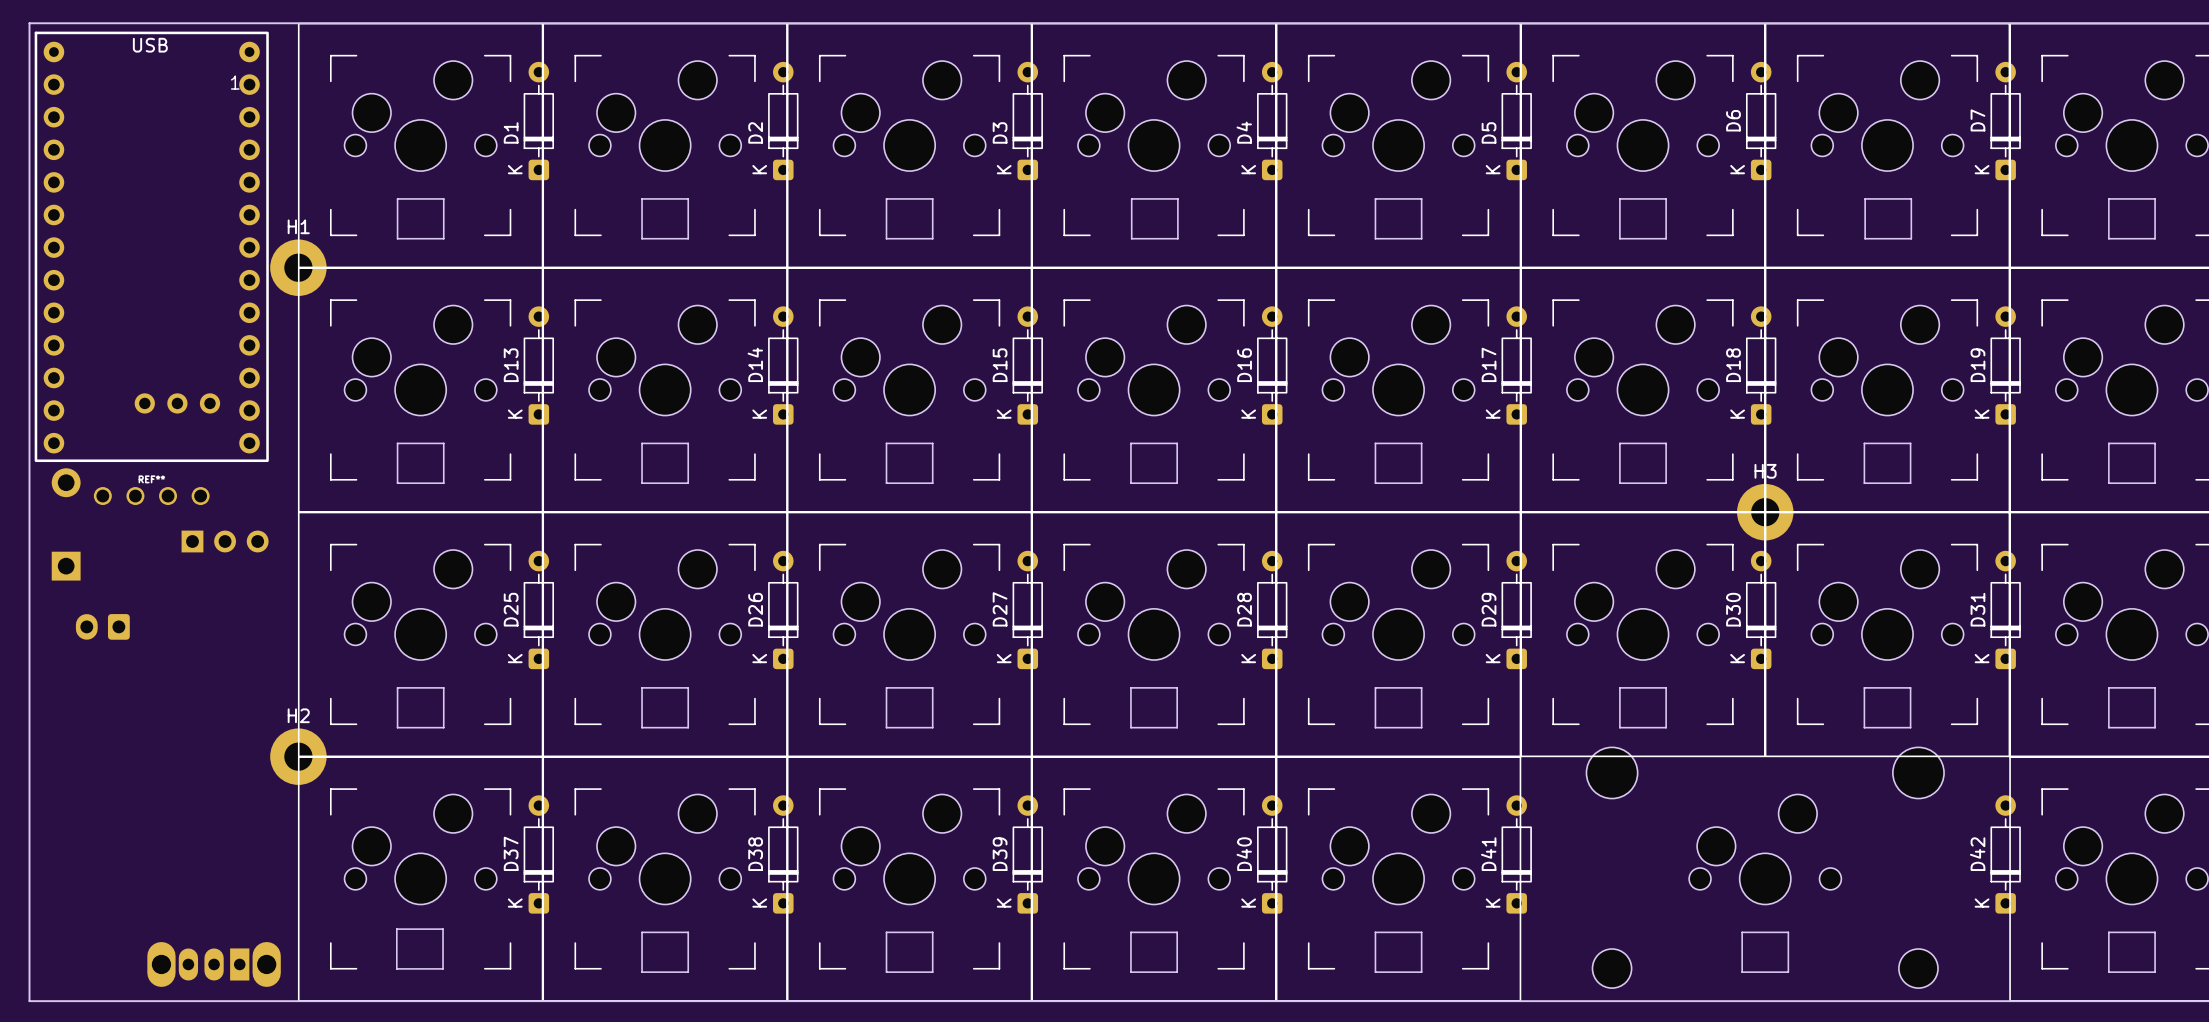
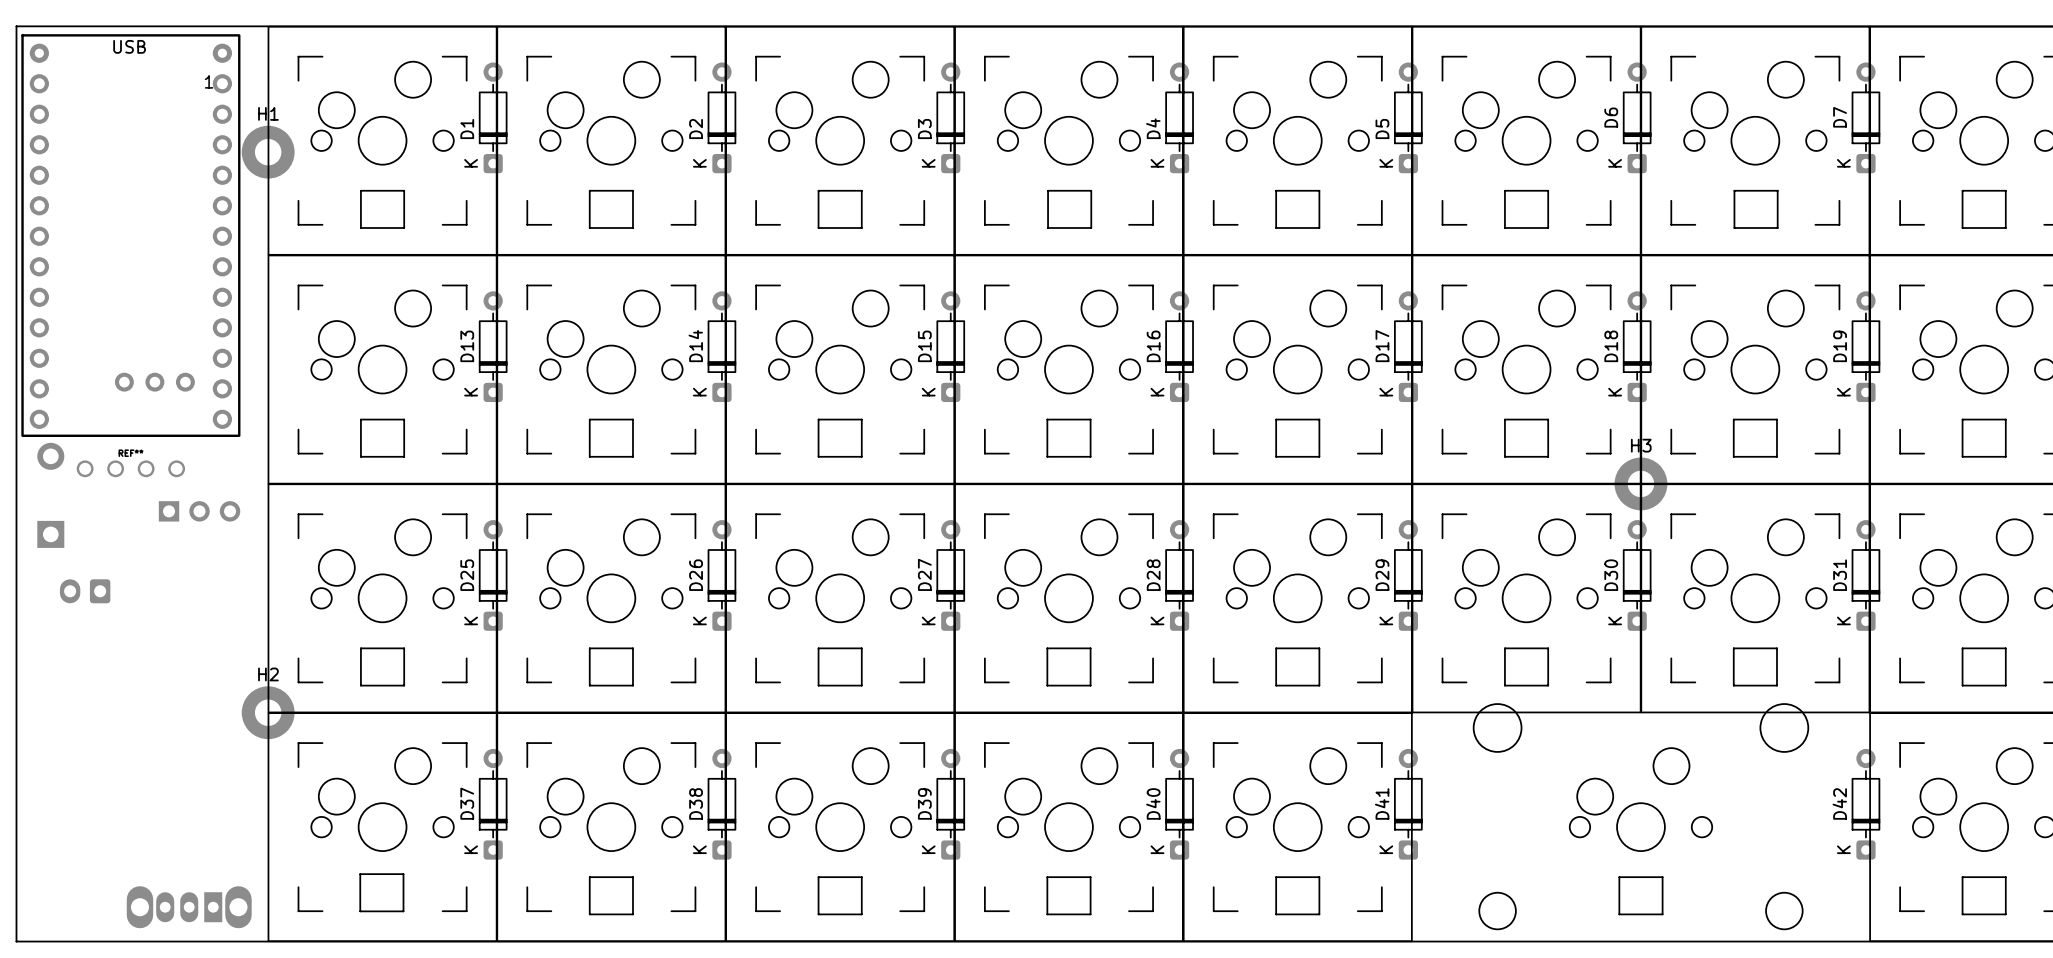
H1 position: (298, 267) -> (268, 152)

